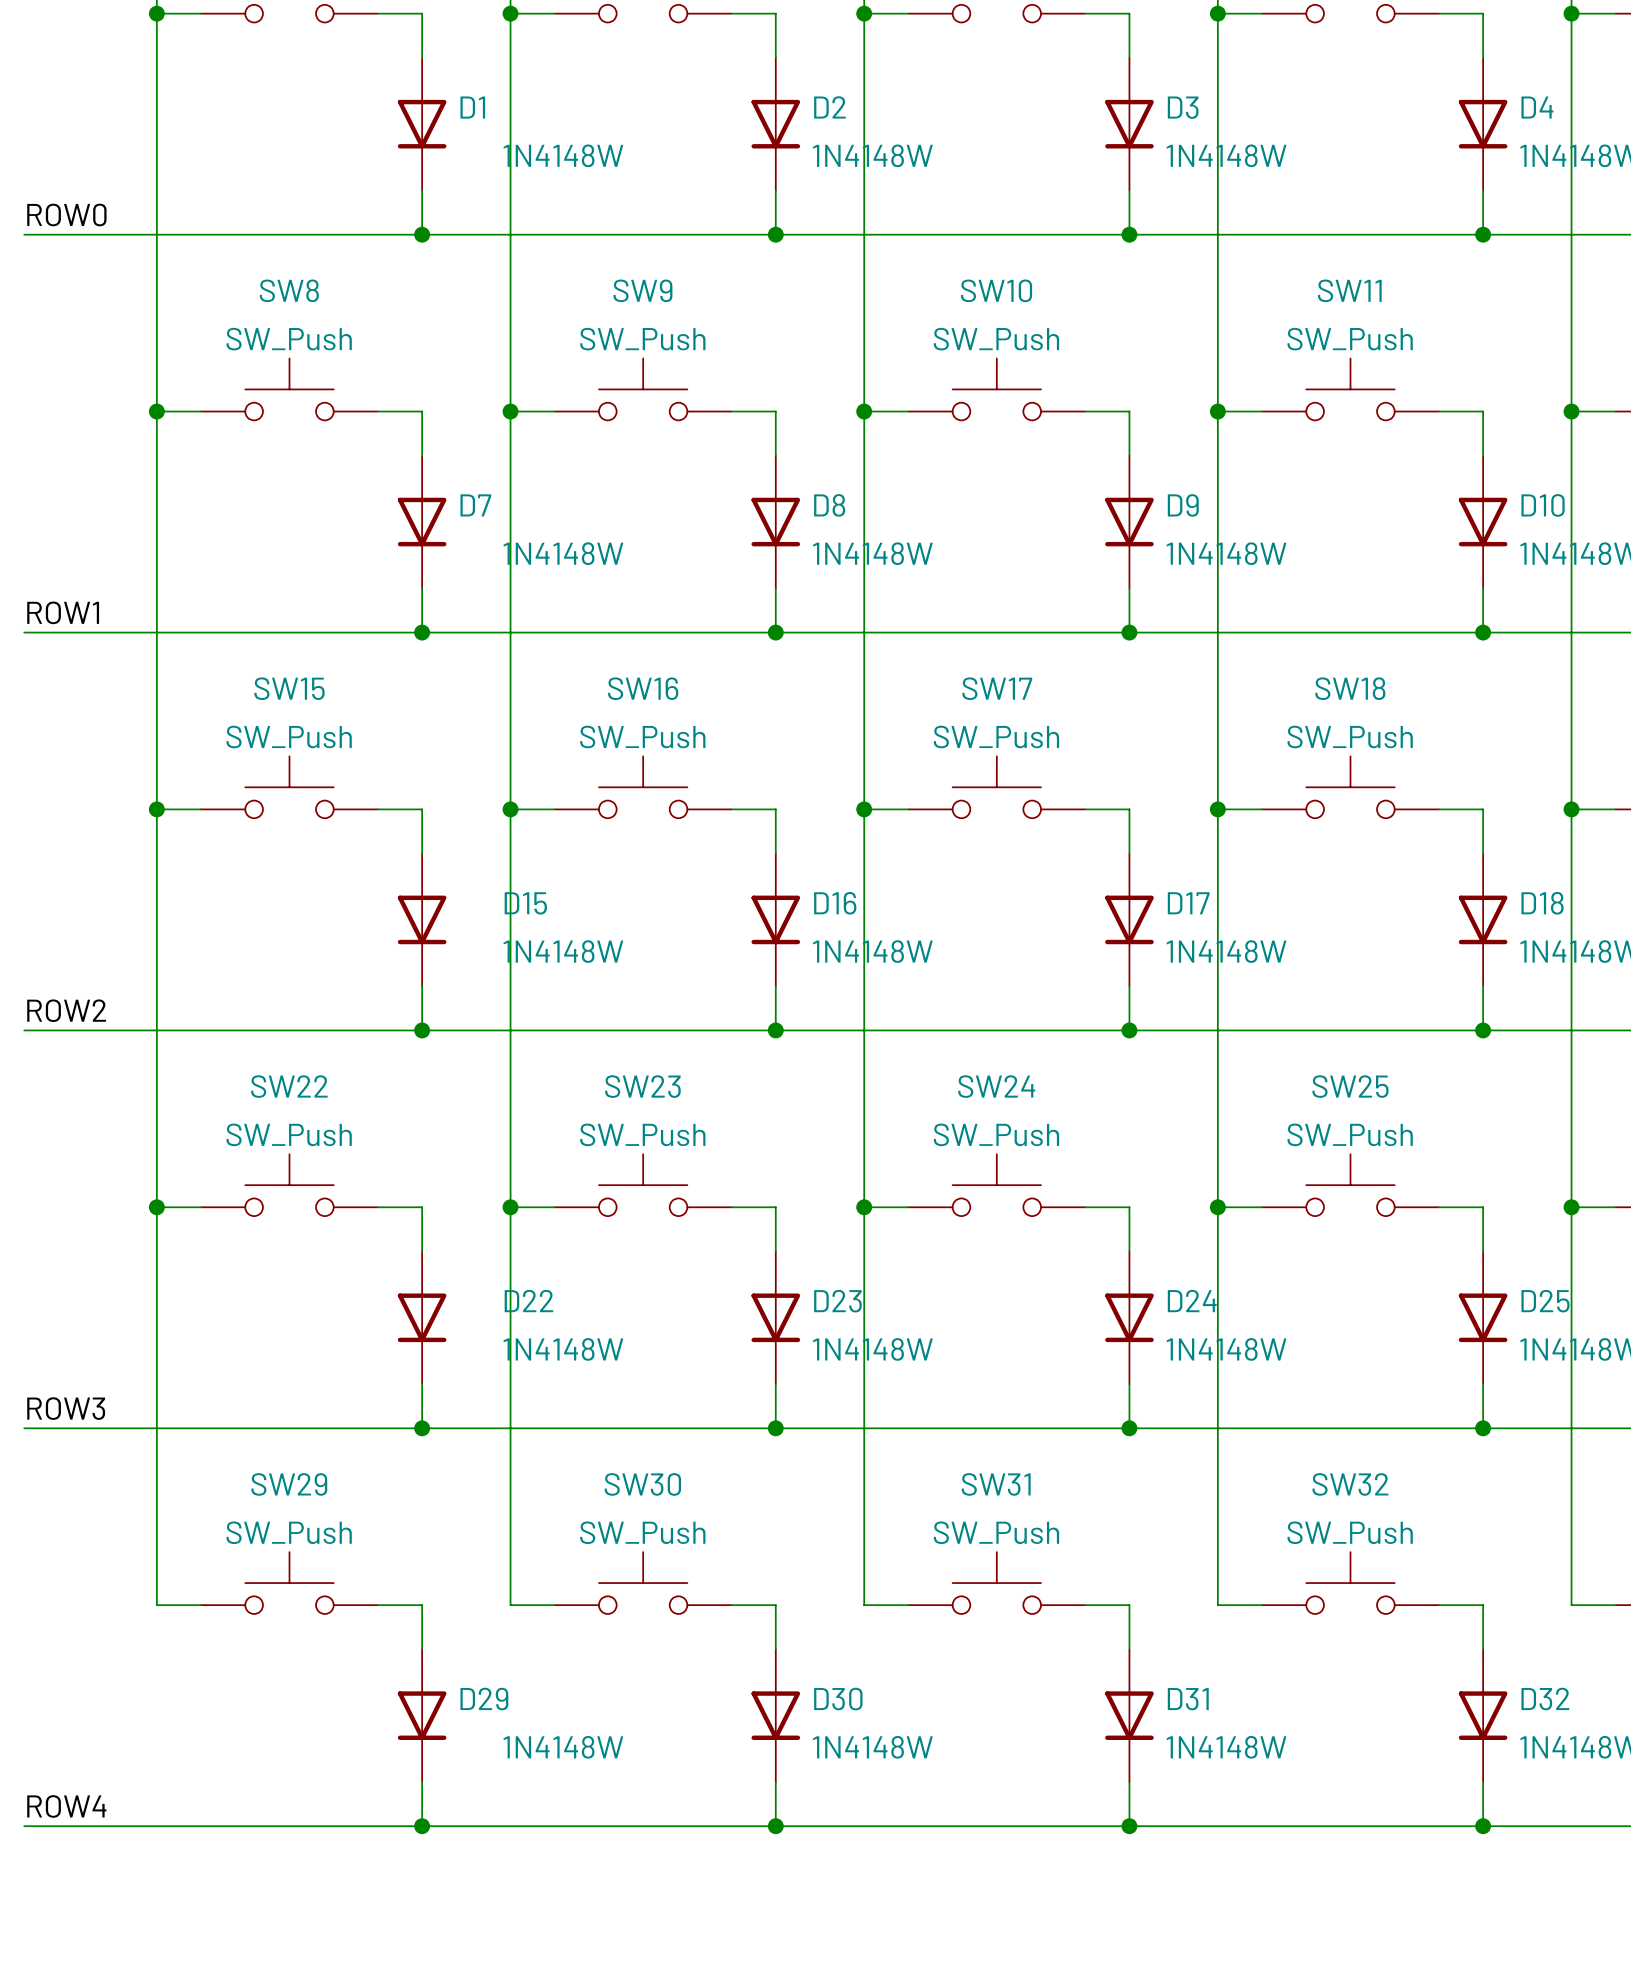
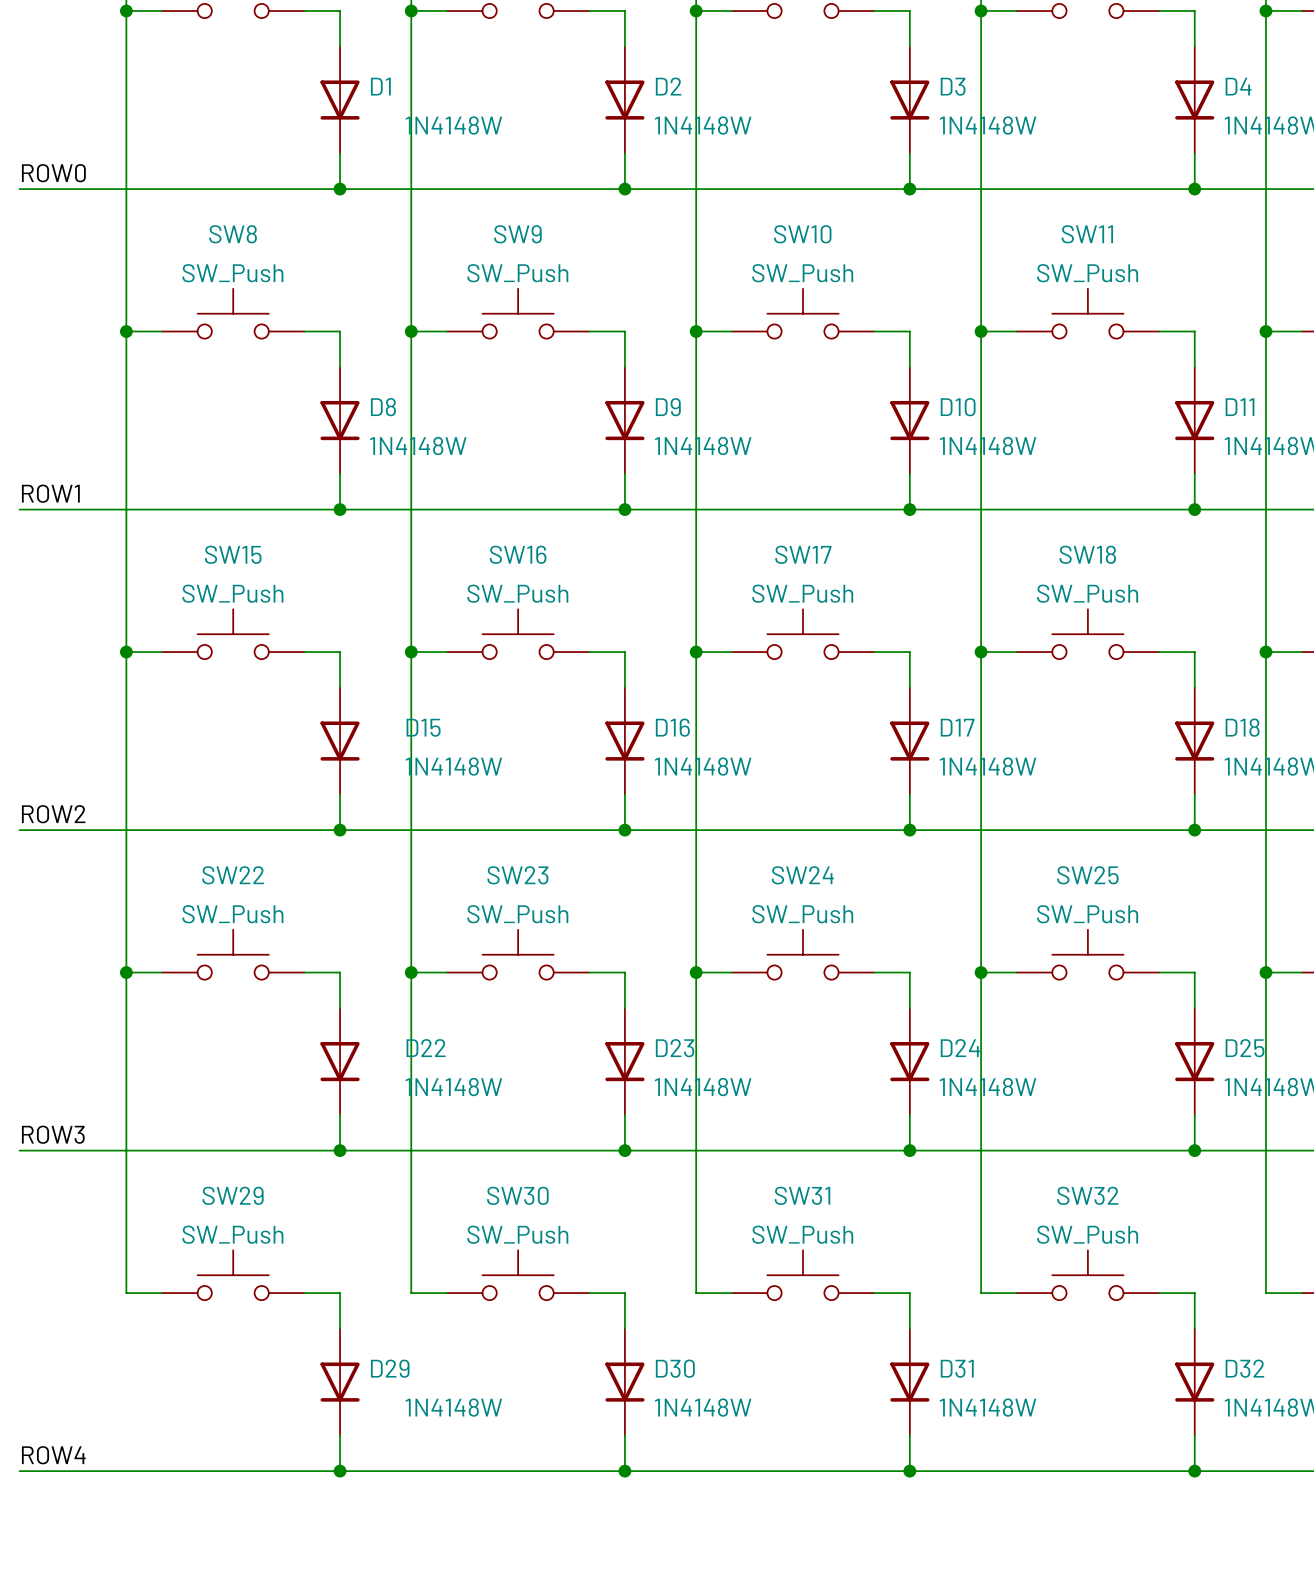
D7 name: D7 (475, 505) -> D8 (383, 407)
D8 name: D8 (829, 505) -> D9 (668, 407)
D9 name: D9 (1183, 505) -> D10 (958, 407)
D10 name: D10 (1543, 505) -> D11 (1240, 407)
D7 value position: 1N4148W (563, 553) -> 1N4148W (418, 446)

